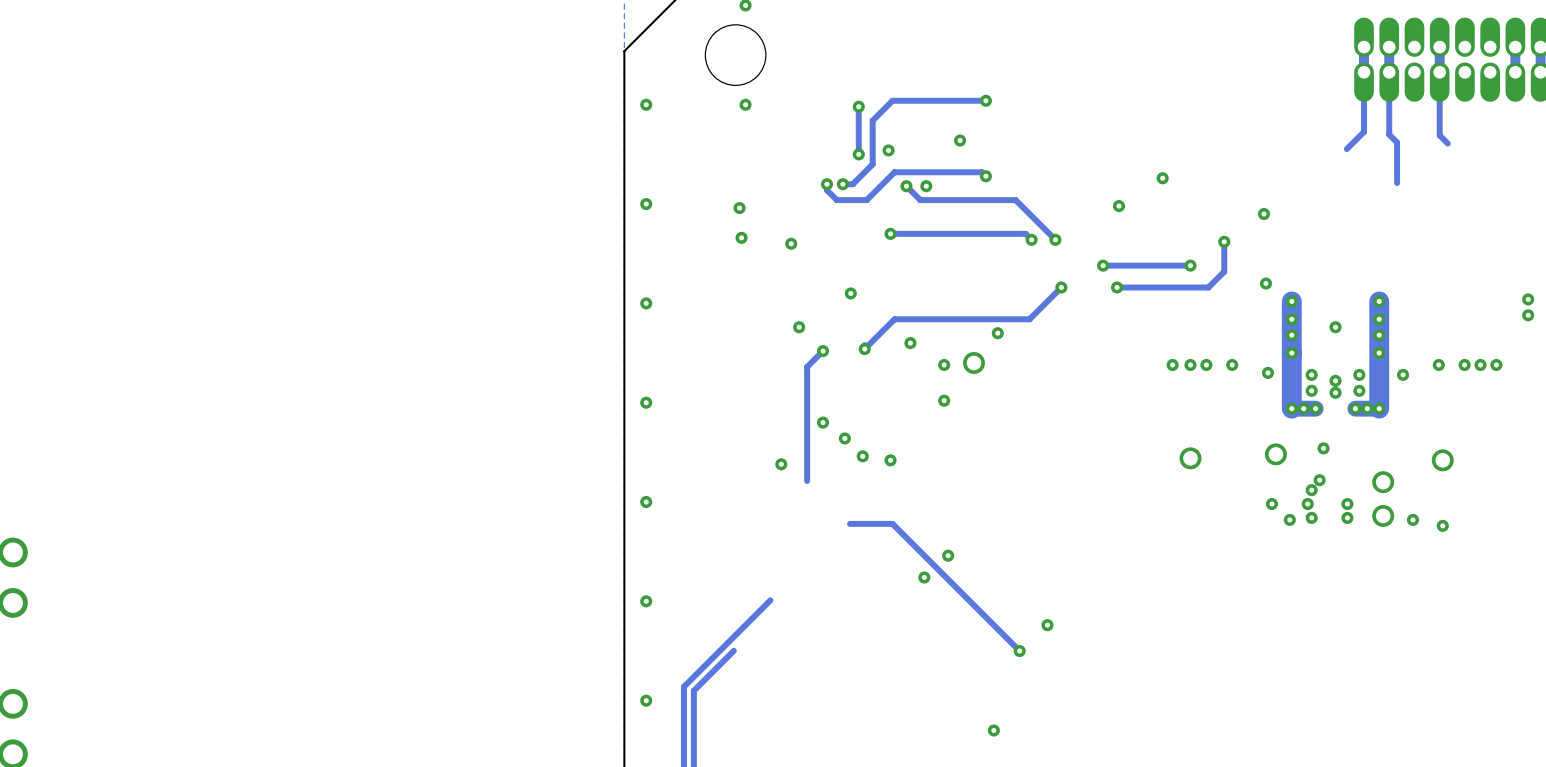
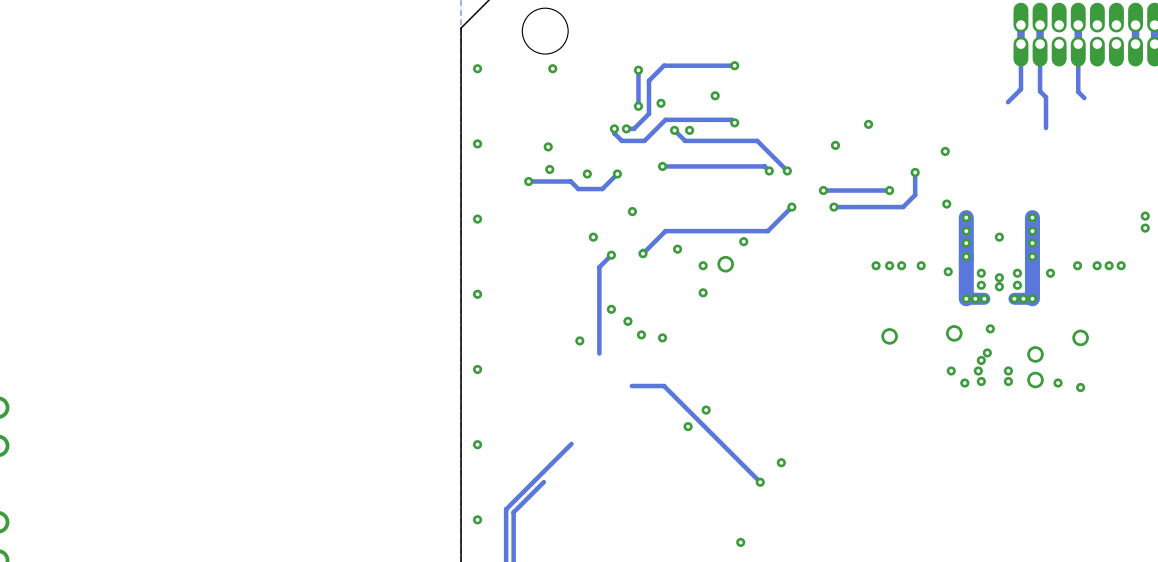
track: none -> (617, 173) (602, 189) (578, 189) (570, 181) (528, 181)
via: none -> (617, 173)
via: none -> (528, 181)

